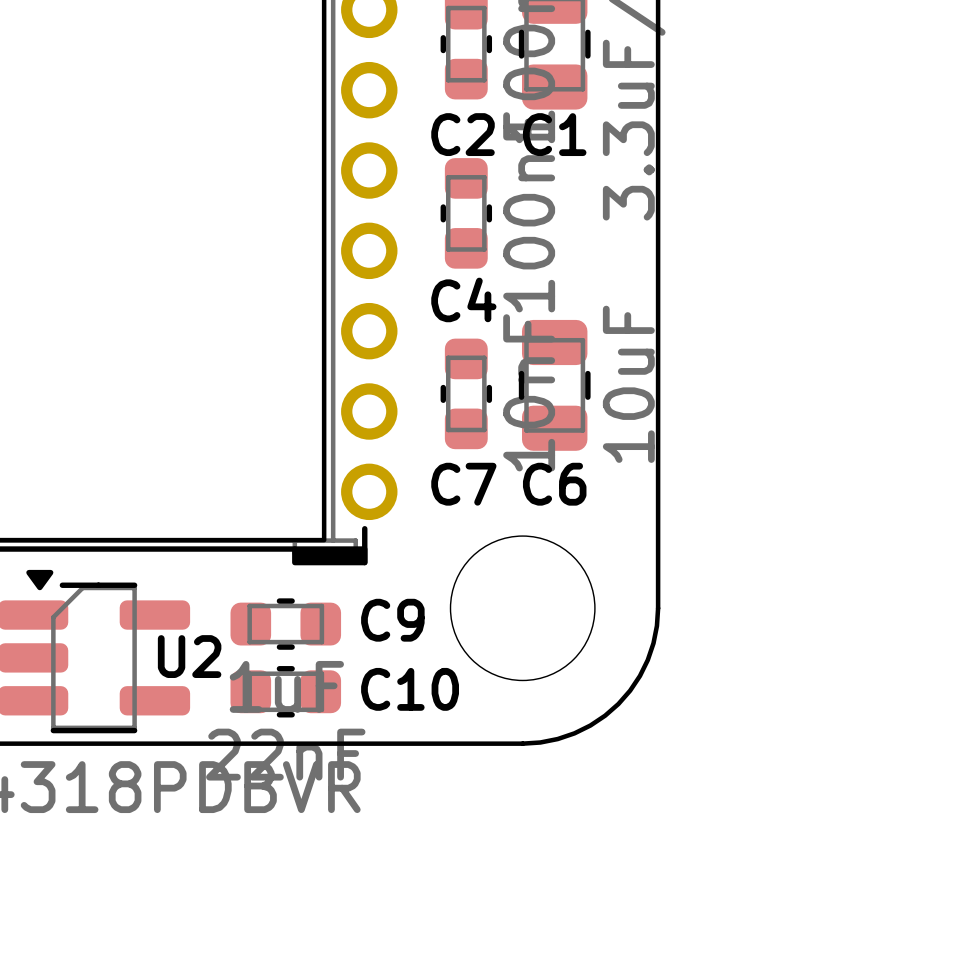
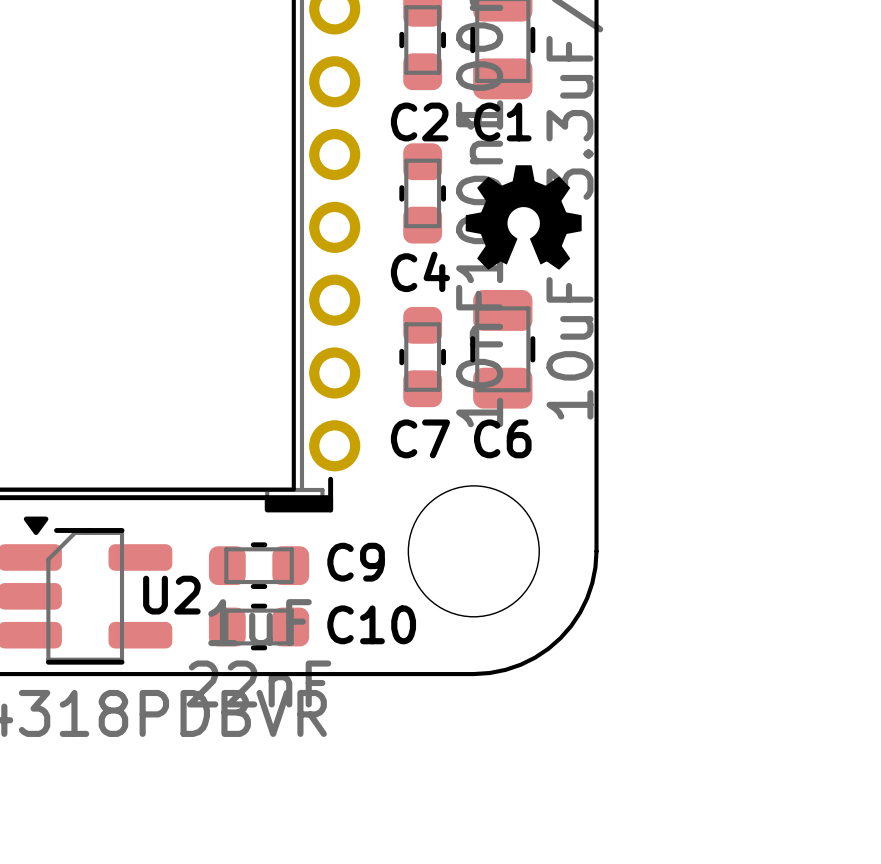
drawing: none -> [465, 165, 582, 270]

